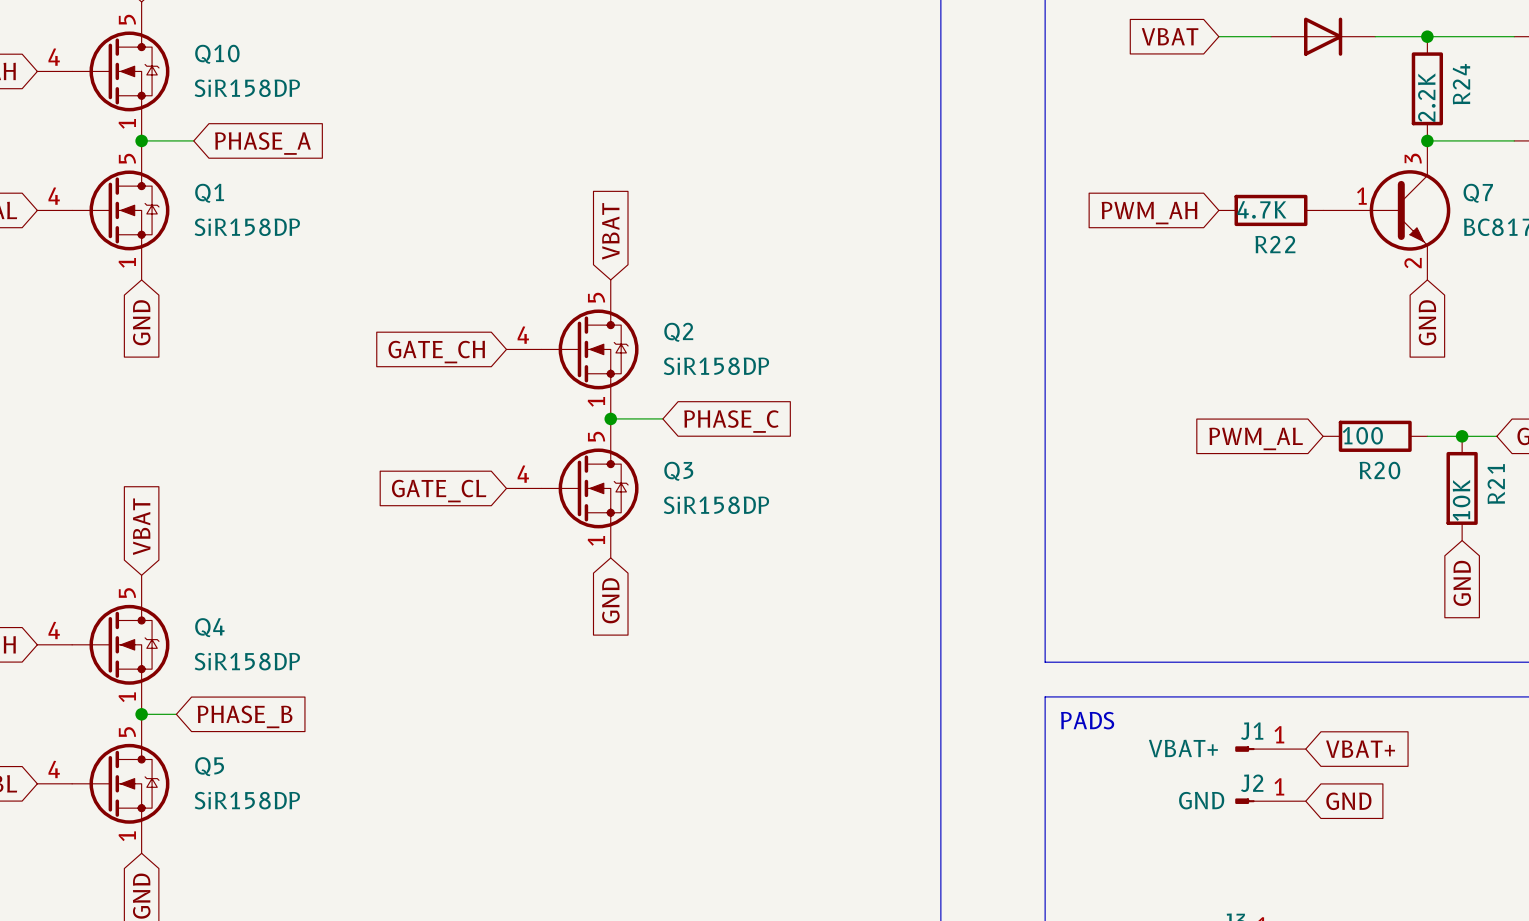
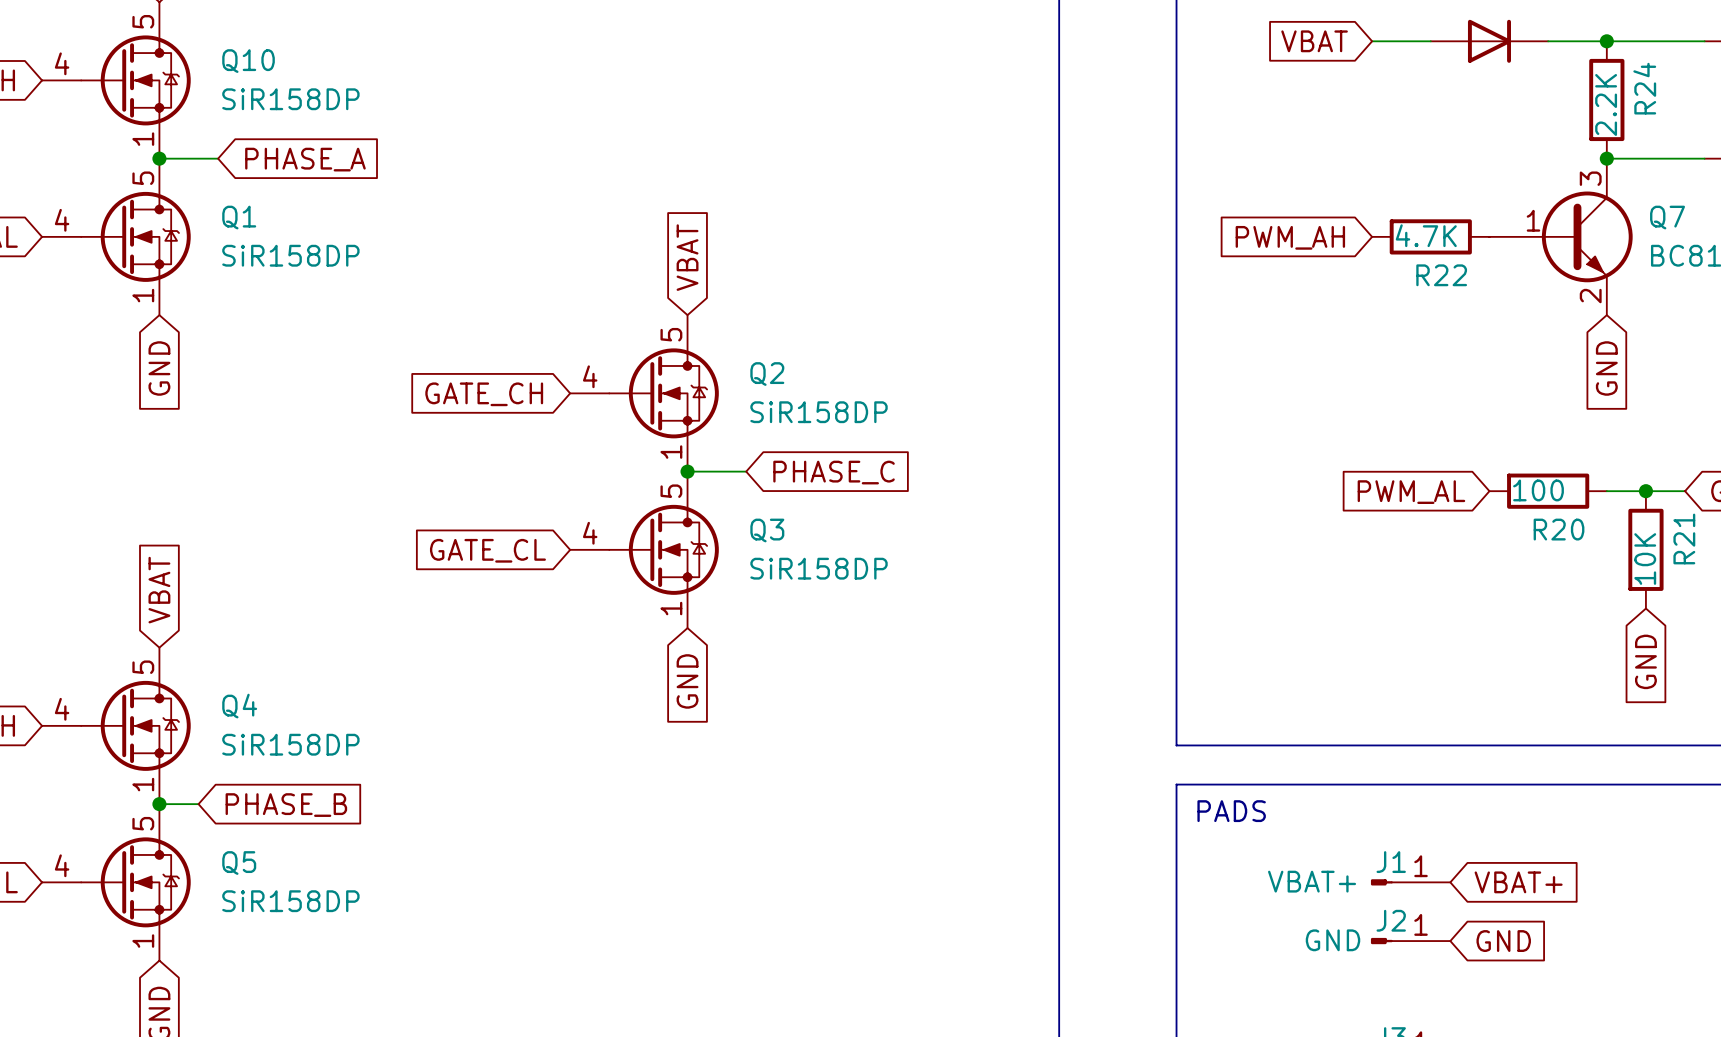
J1 position: (1270, 749) -> (1410, 882)
global label position: VBAT+ (1360, 749) -> VBAT+ (1518, 882)
J2 position: (1270, 801) -> (1410, 941)
global label position: GND (1348, 801) -> GND (1503, 941)

